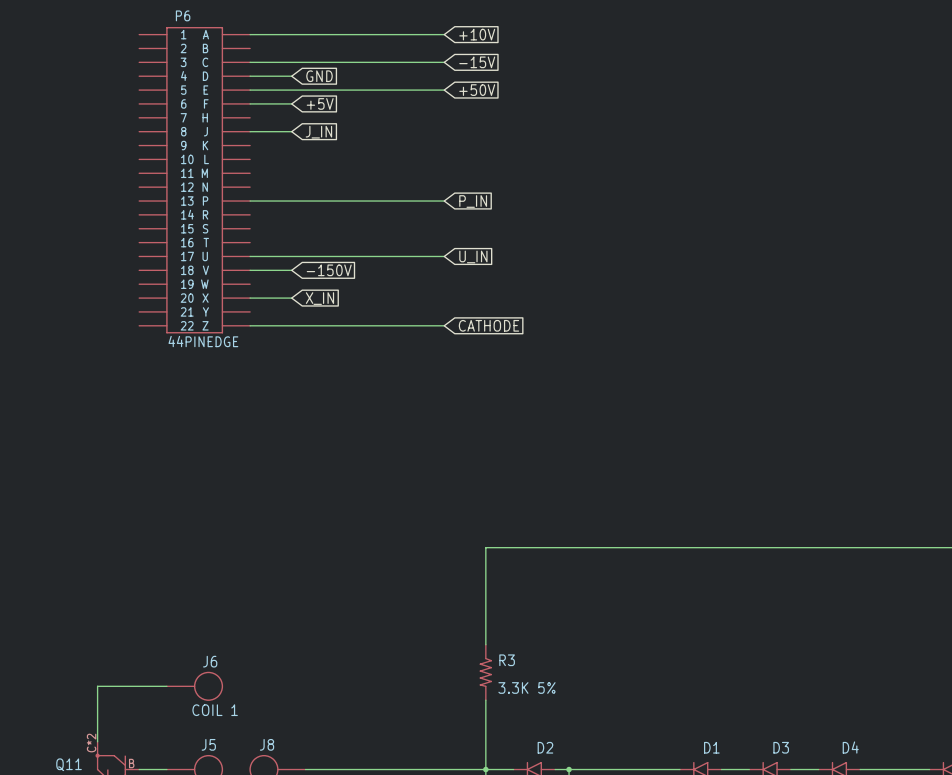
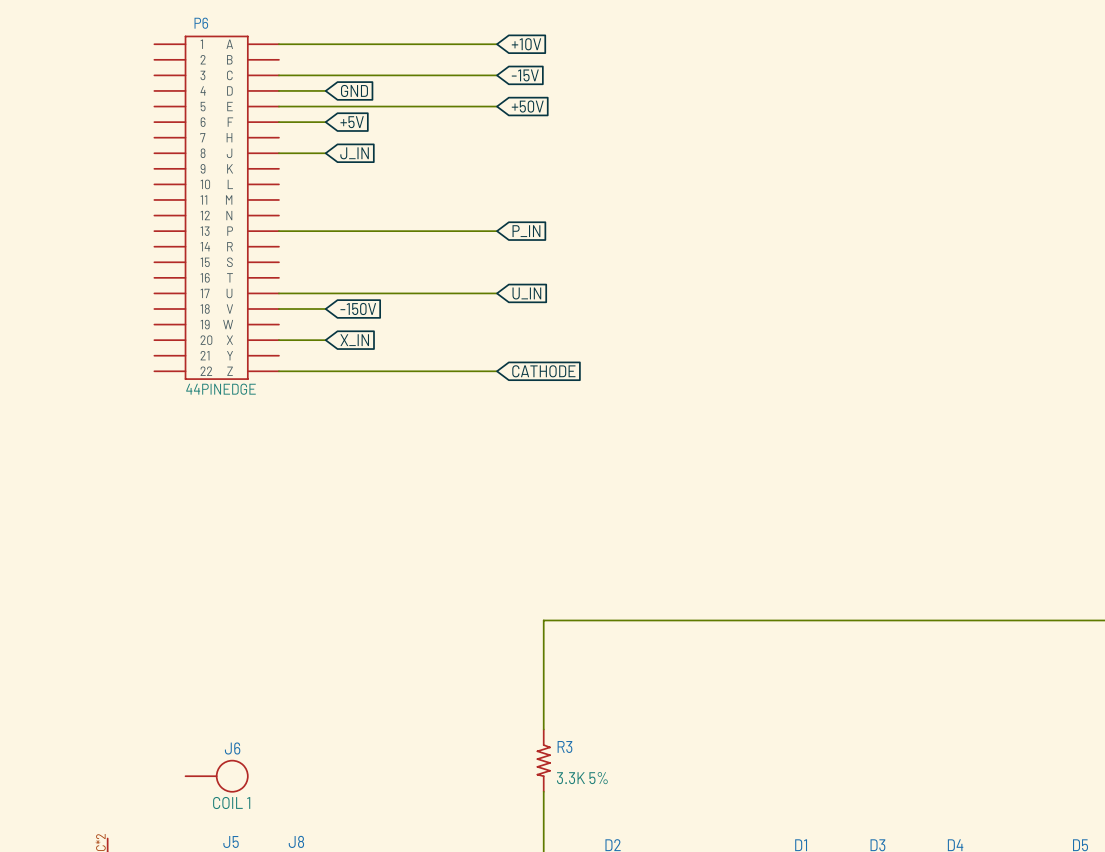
wire: (166, 686) (97, 686) (97, 741) -> none

